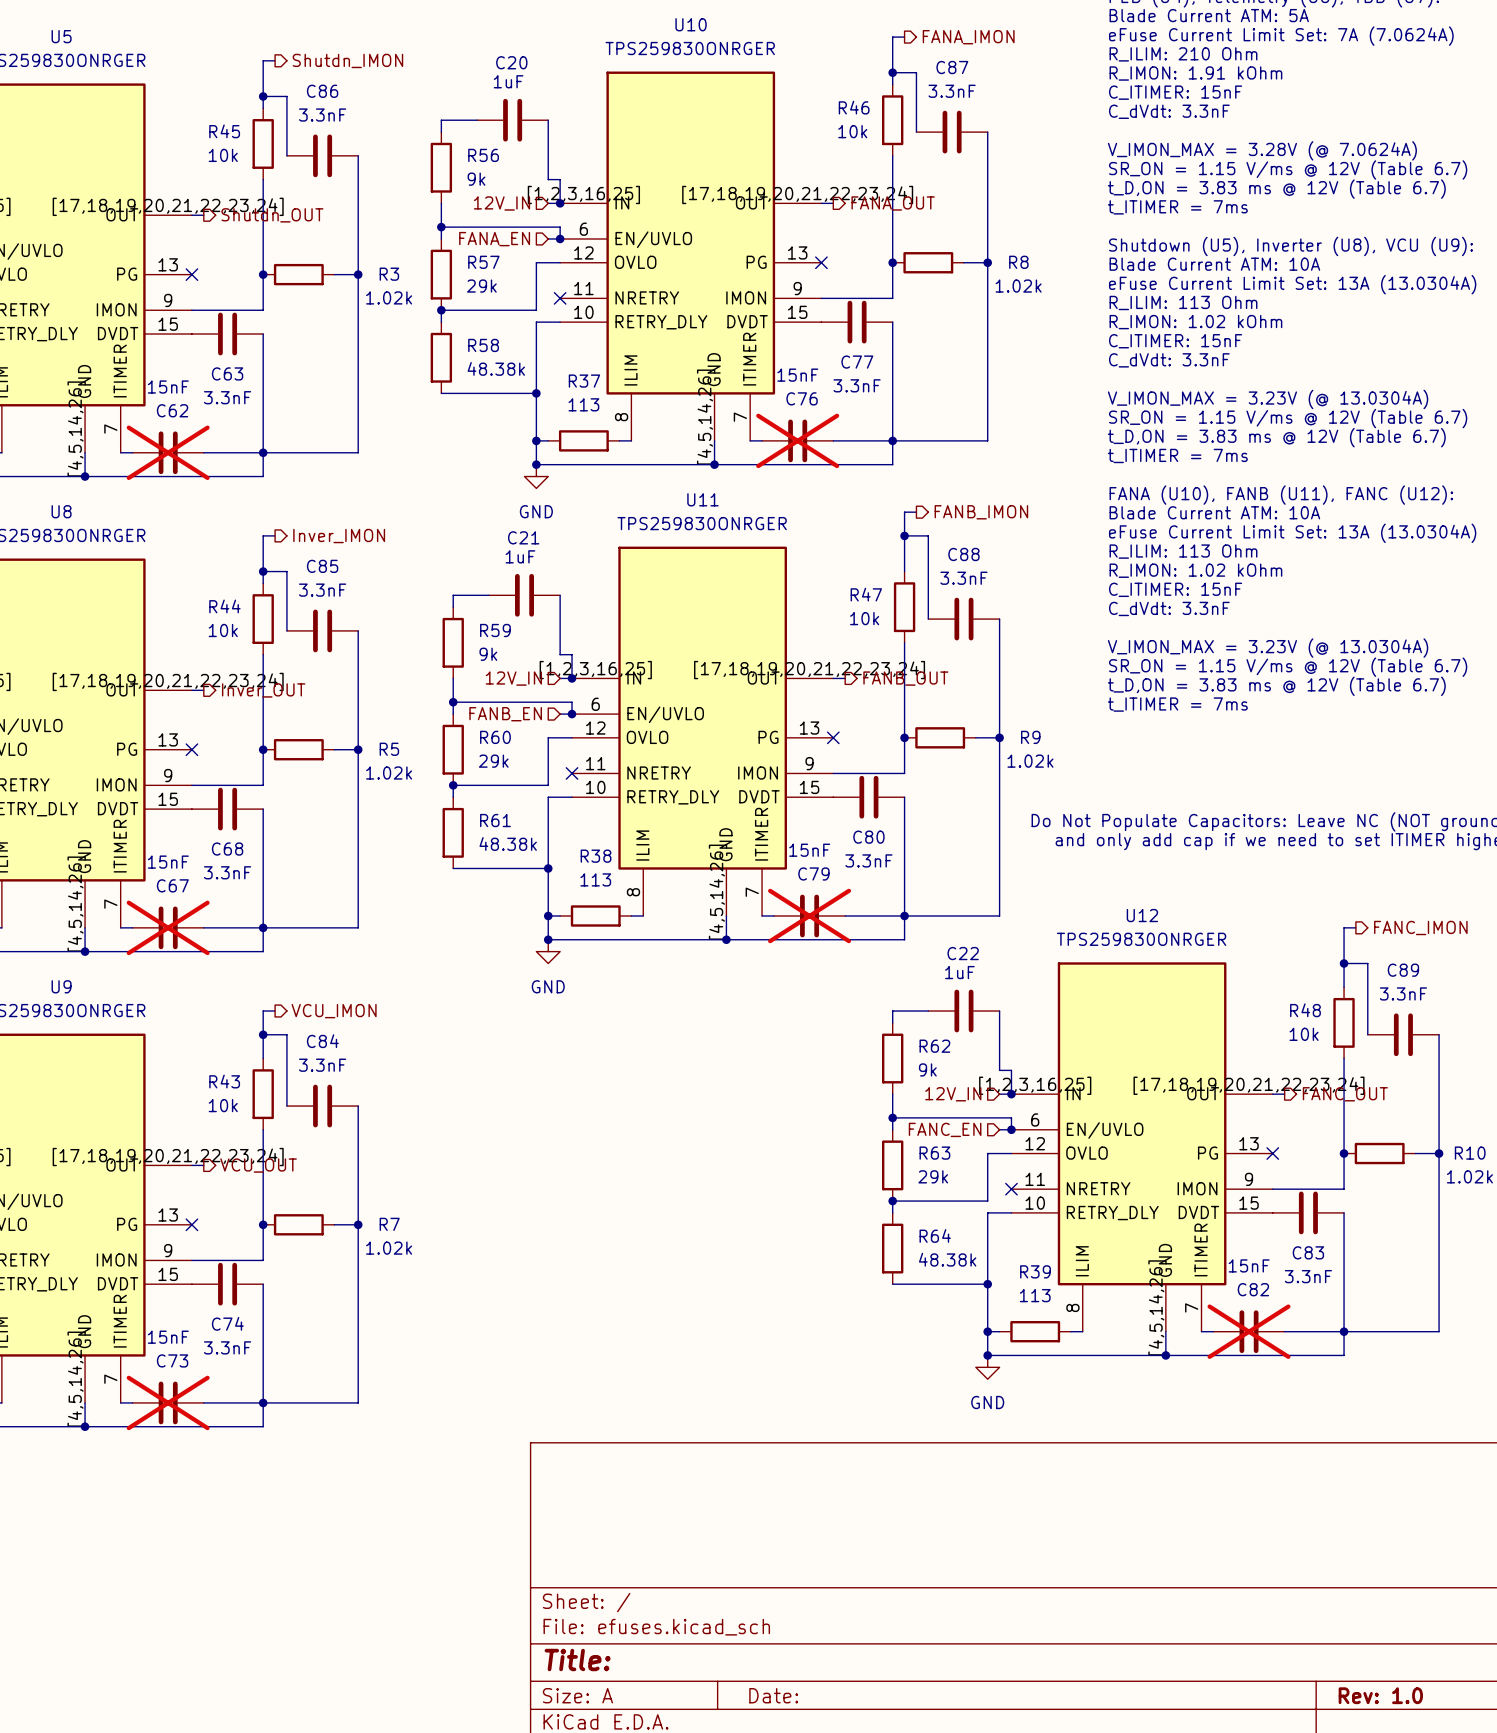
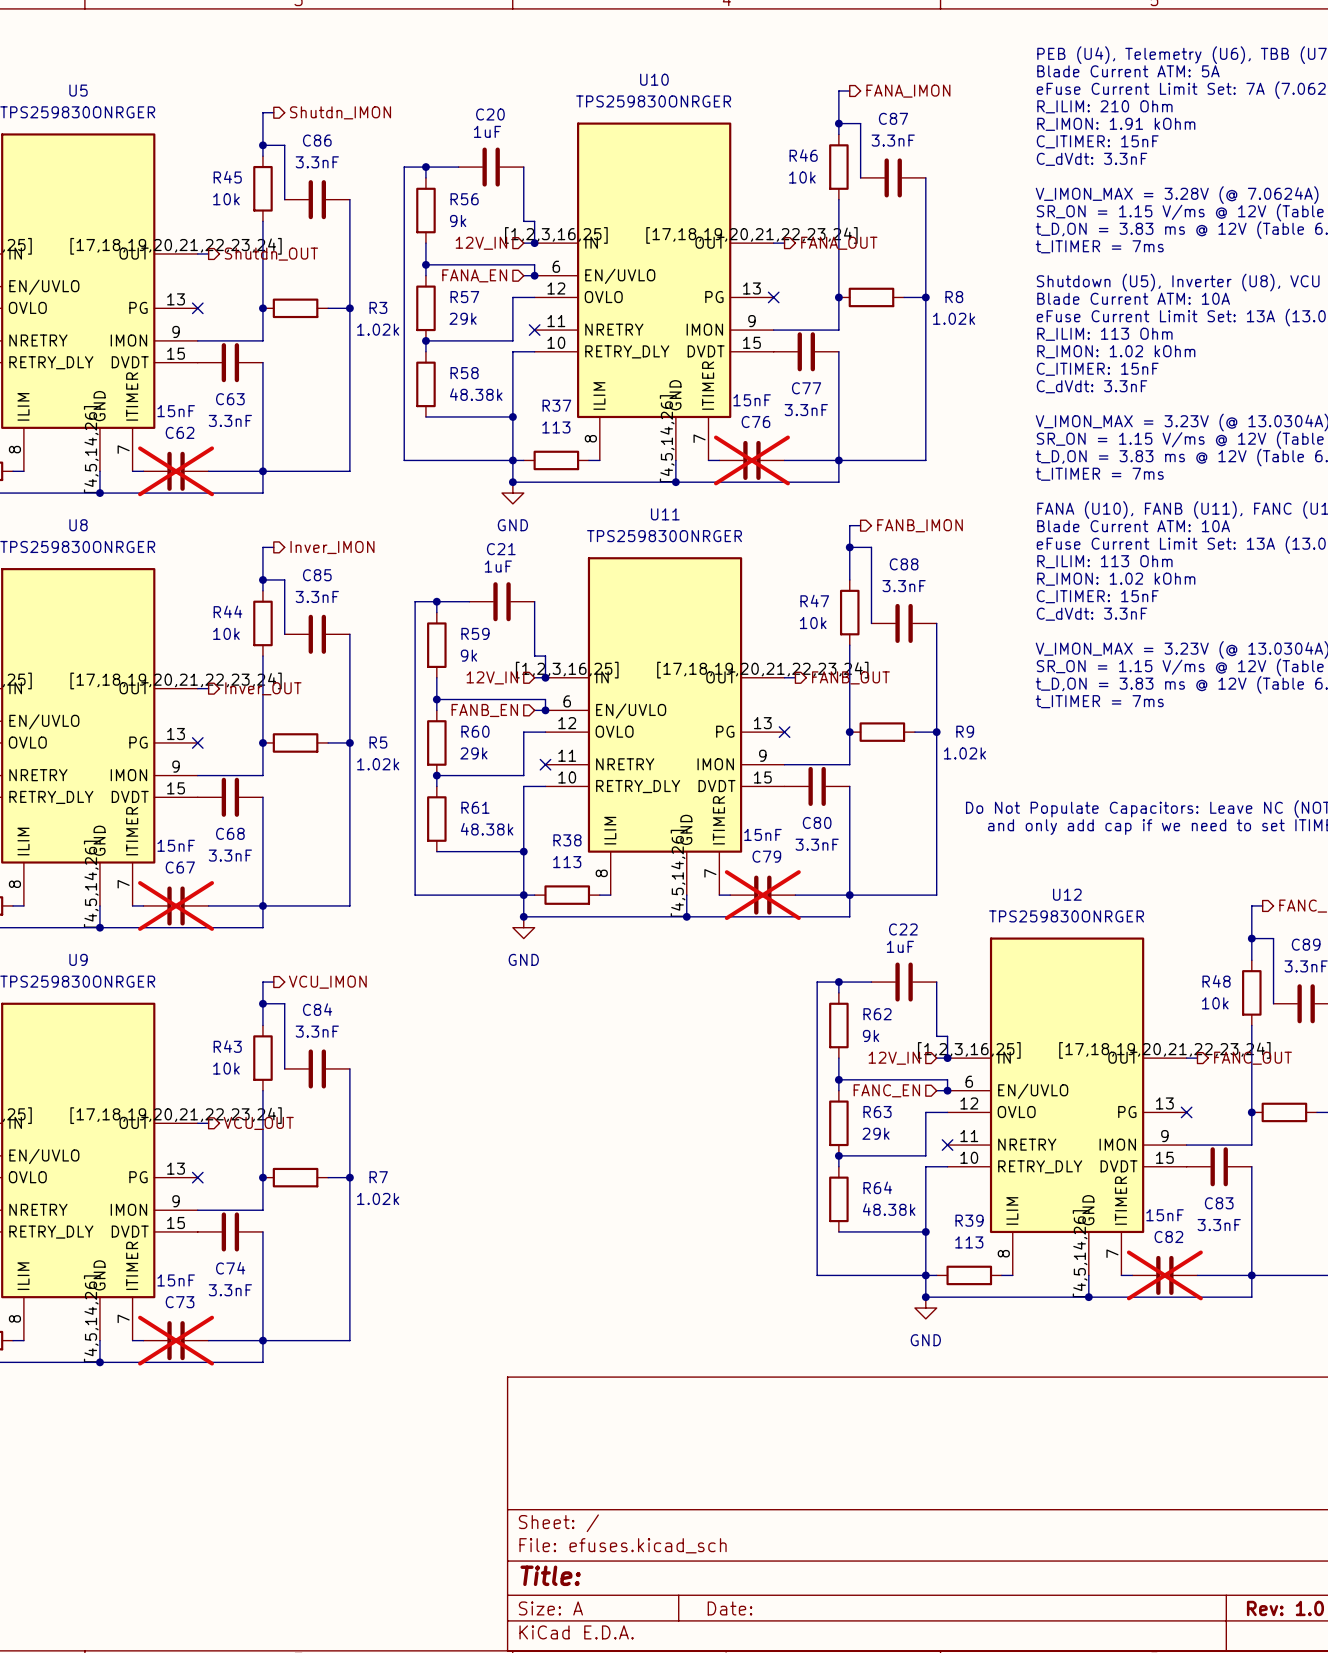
wire: none -> (425, 167) (404, 167) (404, 460) (512, 460)
junction: none -> (425, 167)
wire: none -> (436, 601) (415, 601) (415, 895) (523, 895)
junction: none -> (436, 601)
wire: none -> (838, 982) (817, 982) (817, 1275) (925, 1275)
junction: none -> (838, 982)

